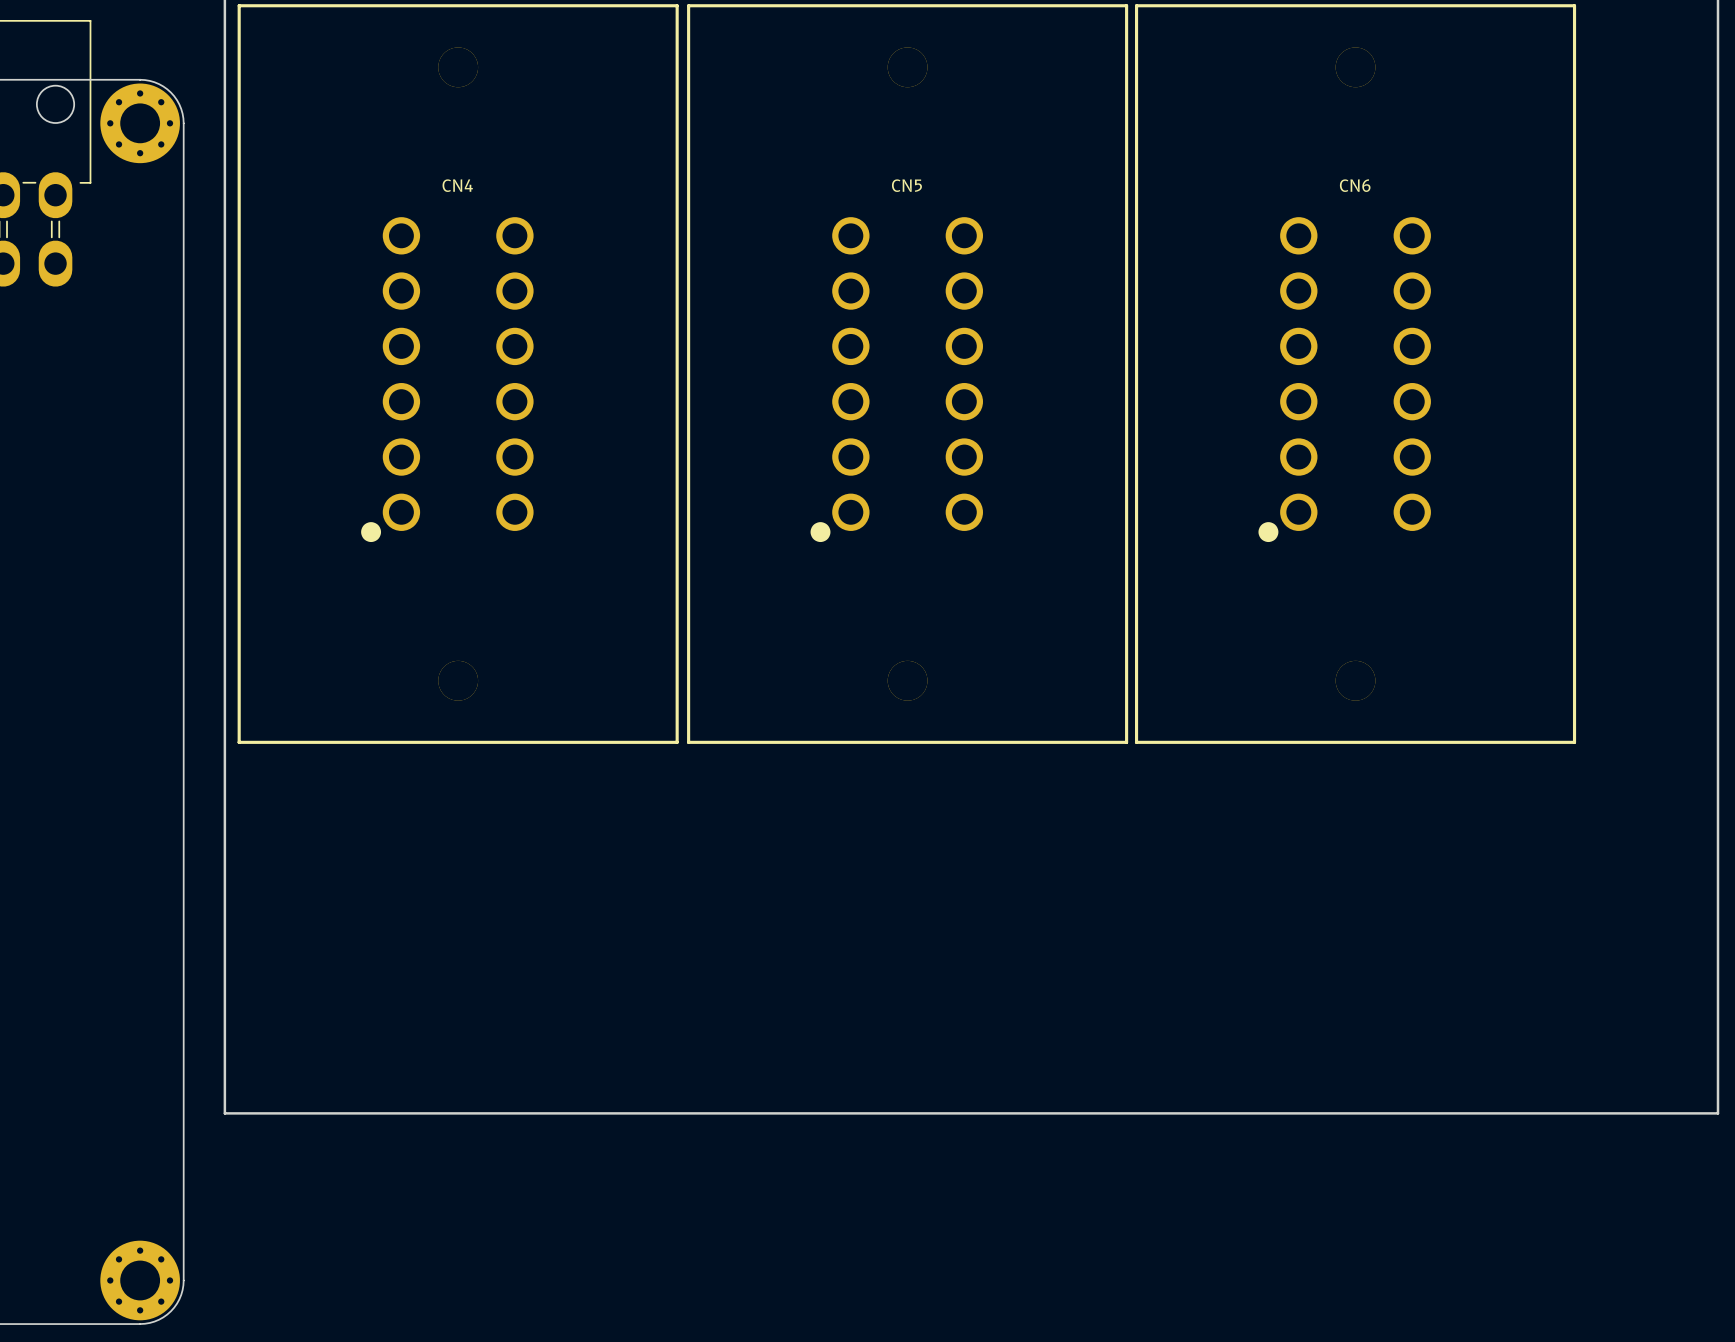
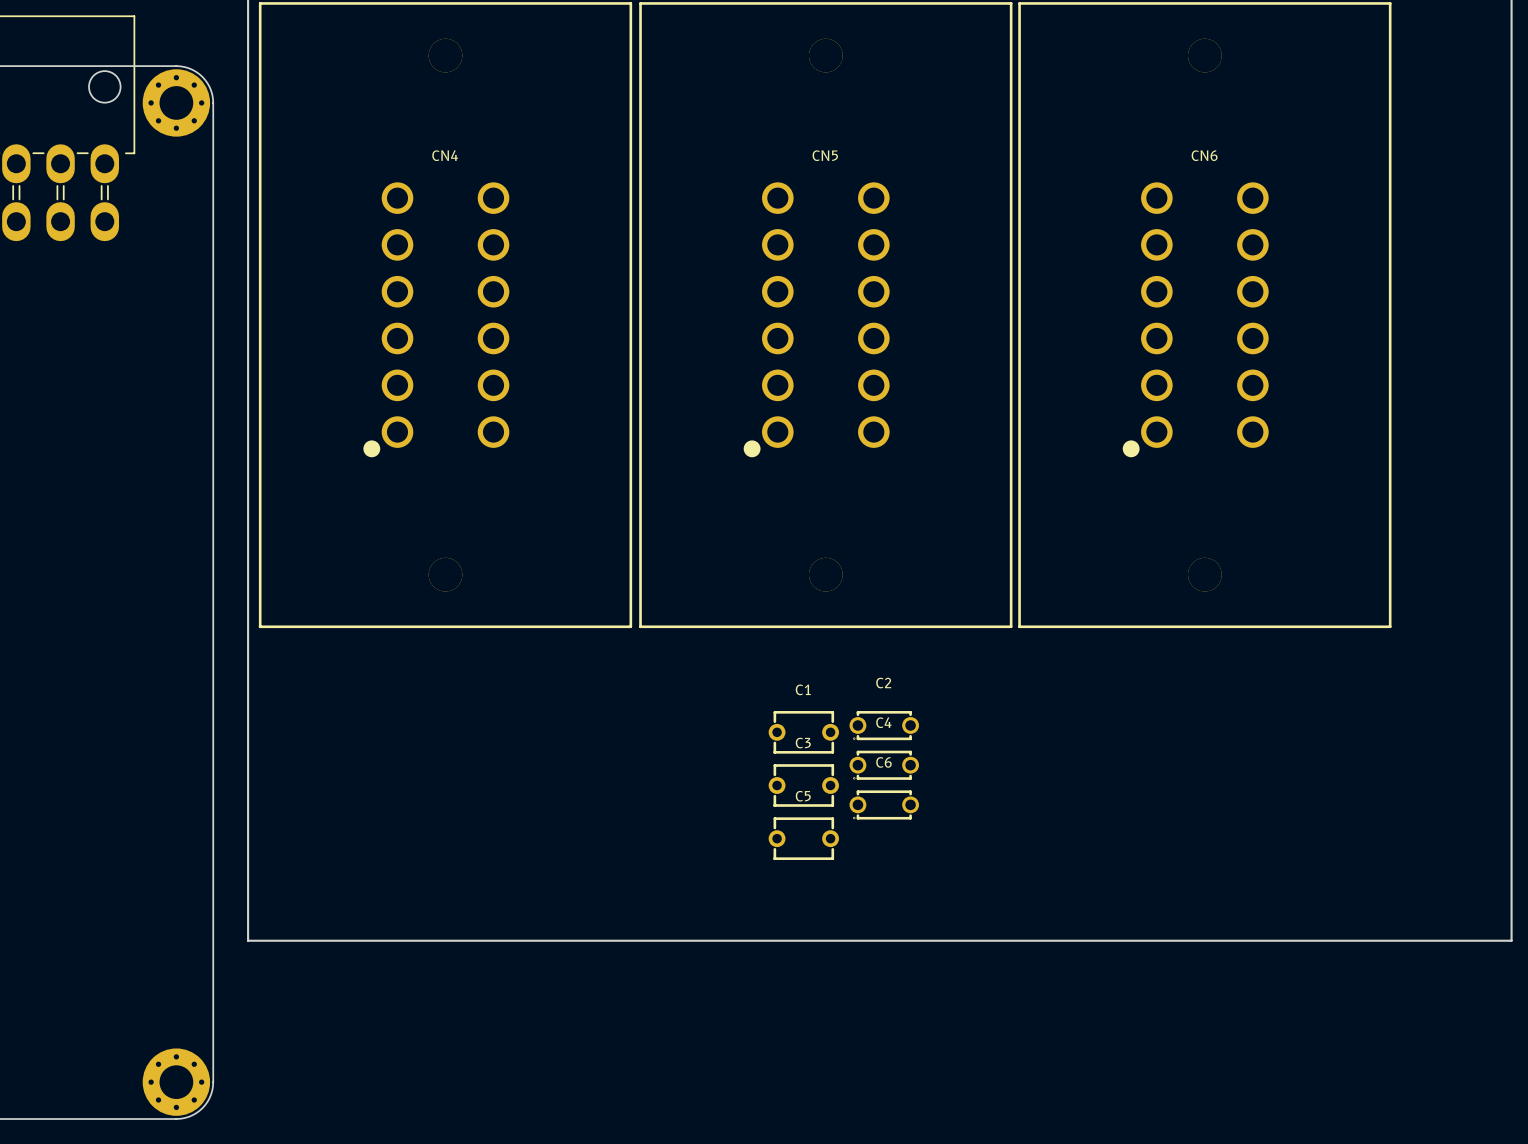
C2: none -> (884, 725)
C1: none -> (803, 732)
C4: none -> (884, 765)
C3: none -> (803, 785)
C6: none -> (884, 804)
C5: none -> (803, 838)

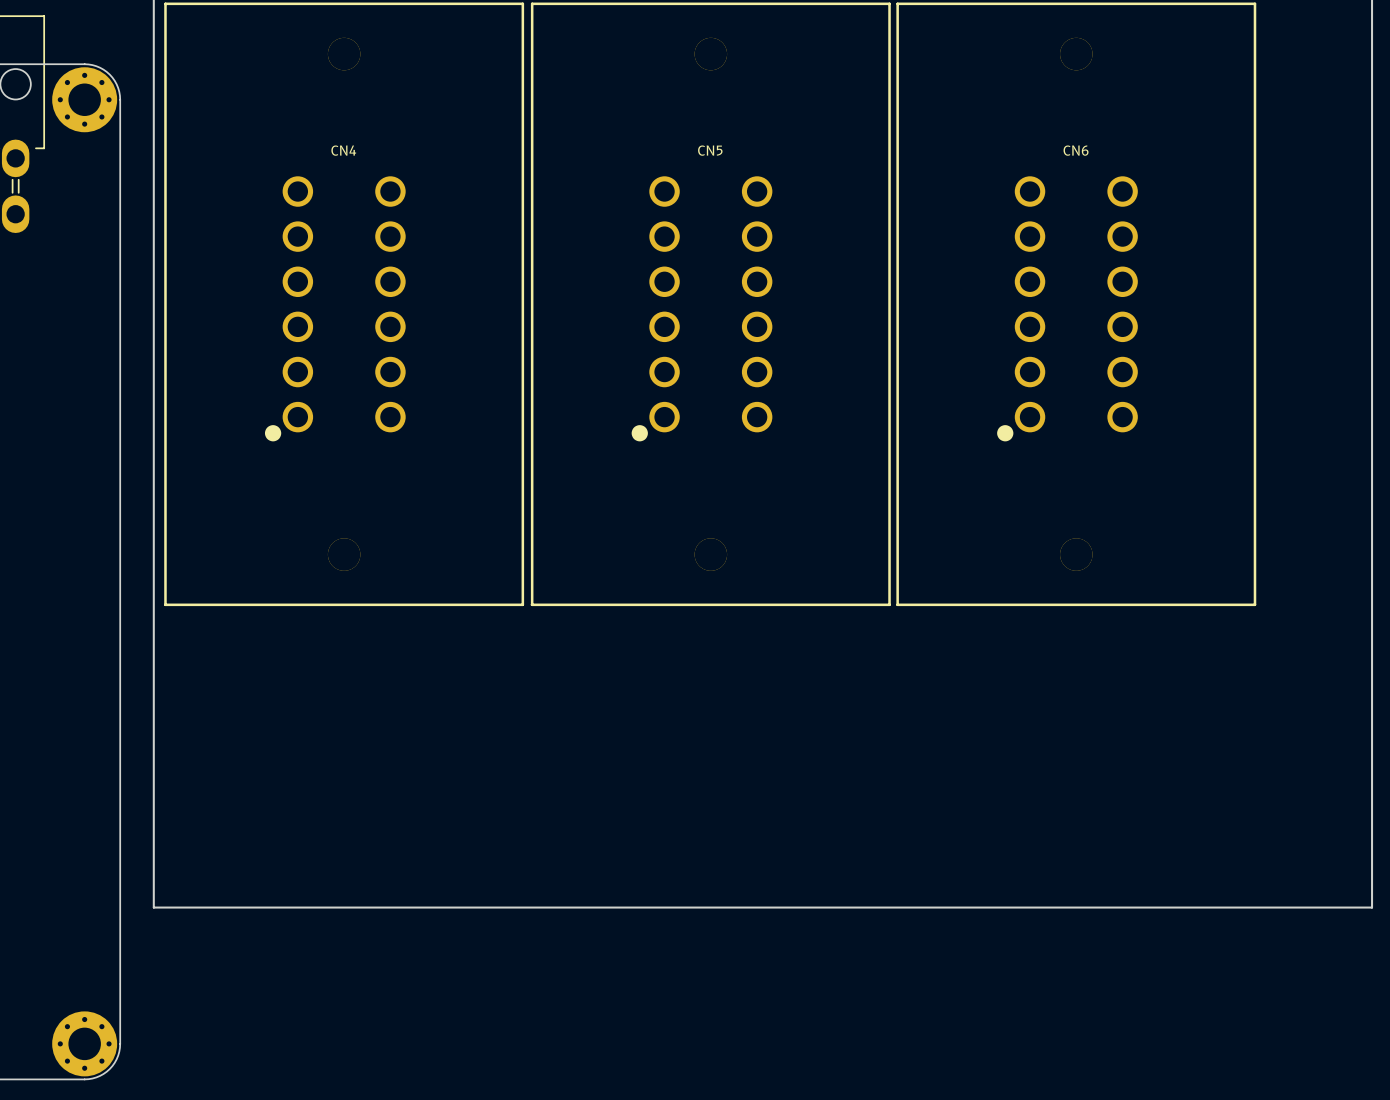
C2: (884, 725) -> none
C1: (803, 732) -> none
C4: (884, 765) -> none
C3: (803, 785) -> none
C6: (884, 804) -> none
C5: (803, 838) -> none

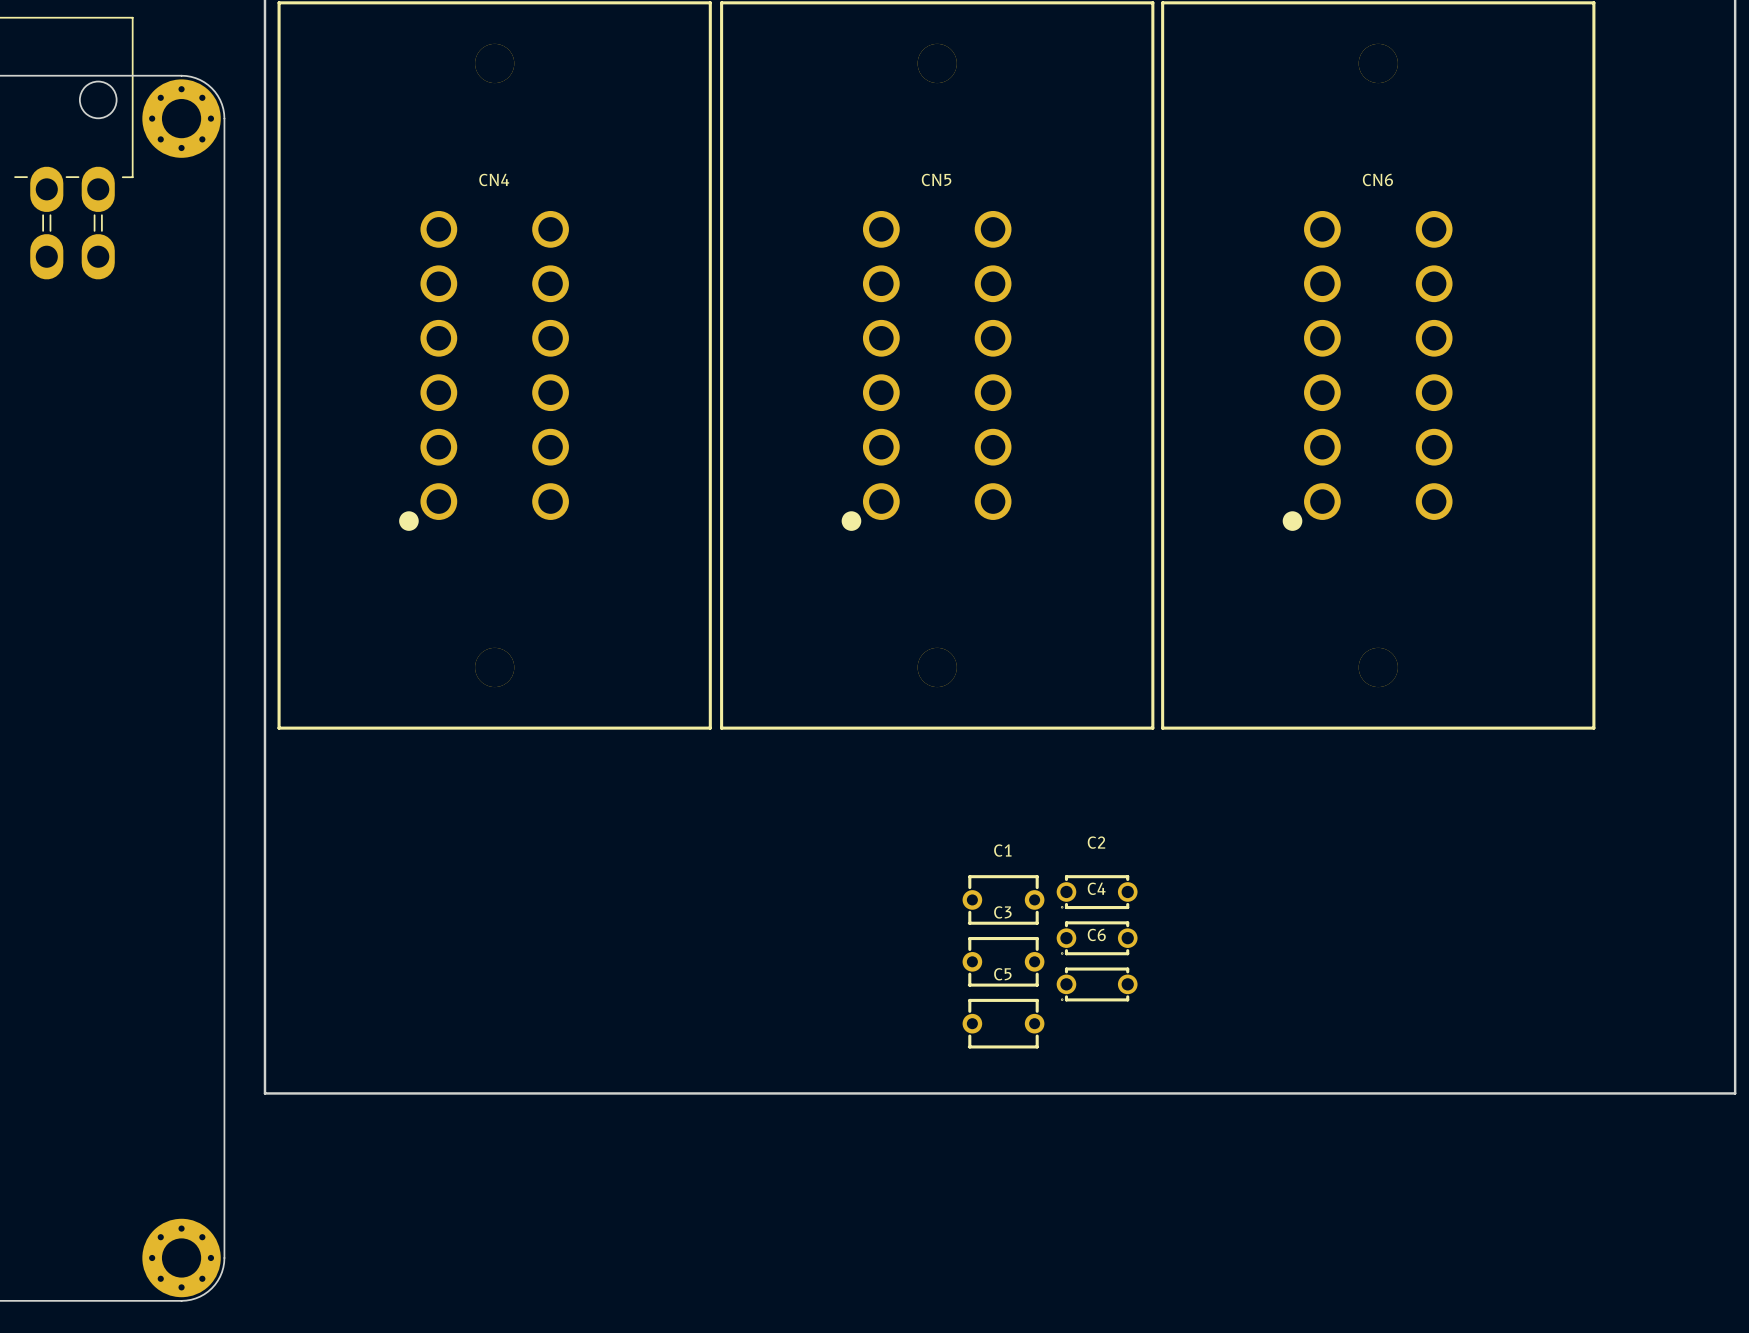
C2: none -> (1097, 892)
C1: none -> (1003, 899)
C4: none -> (1097, 938)
C3: none -> (1003, 961)
C6: none -> (1097, 984)
C5: none -> (1003, 1023)

